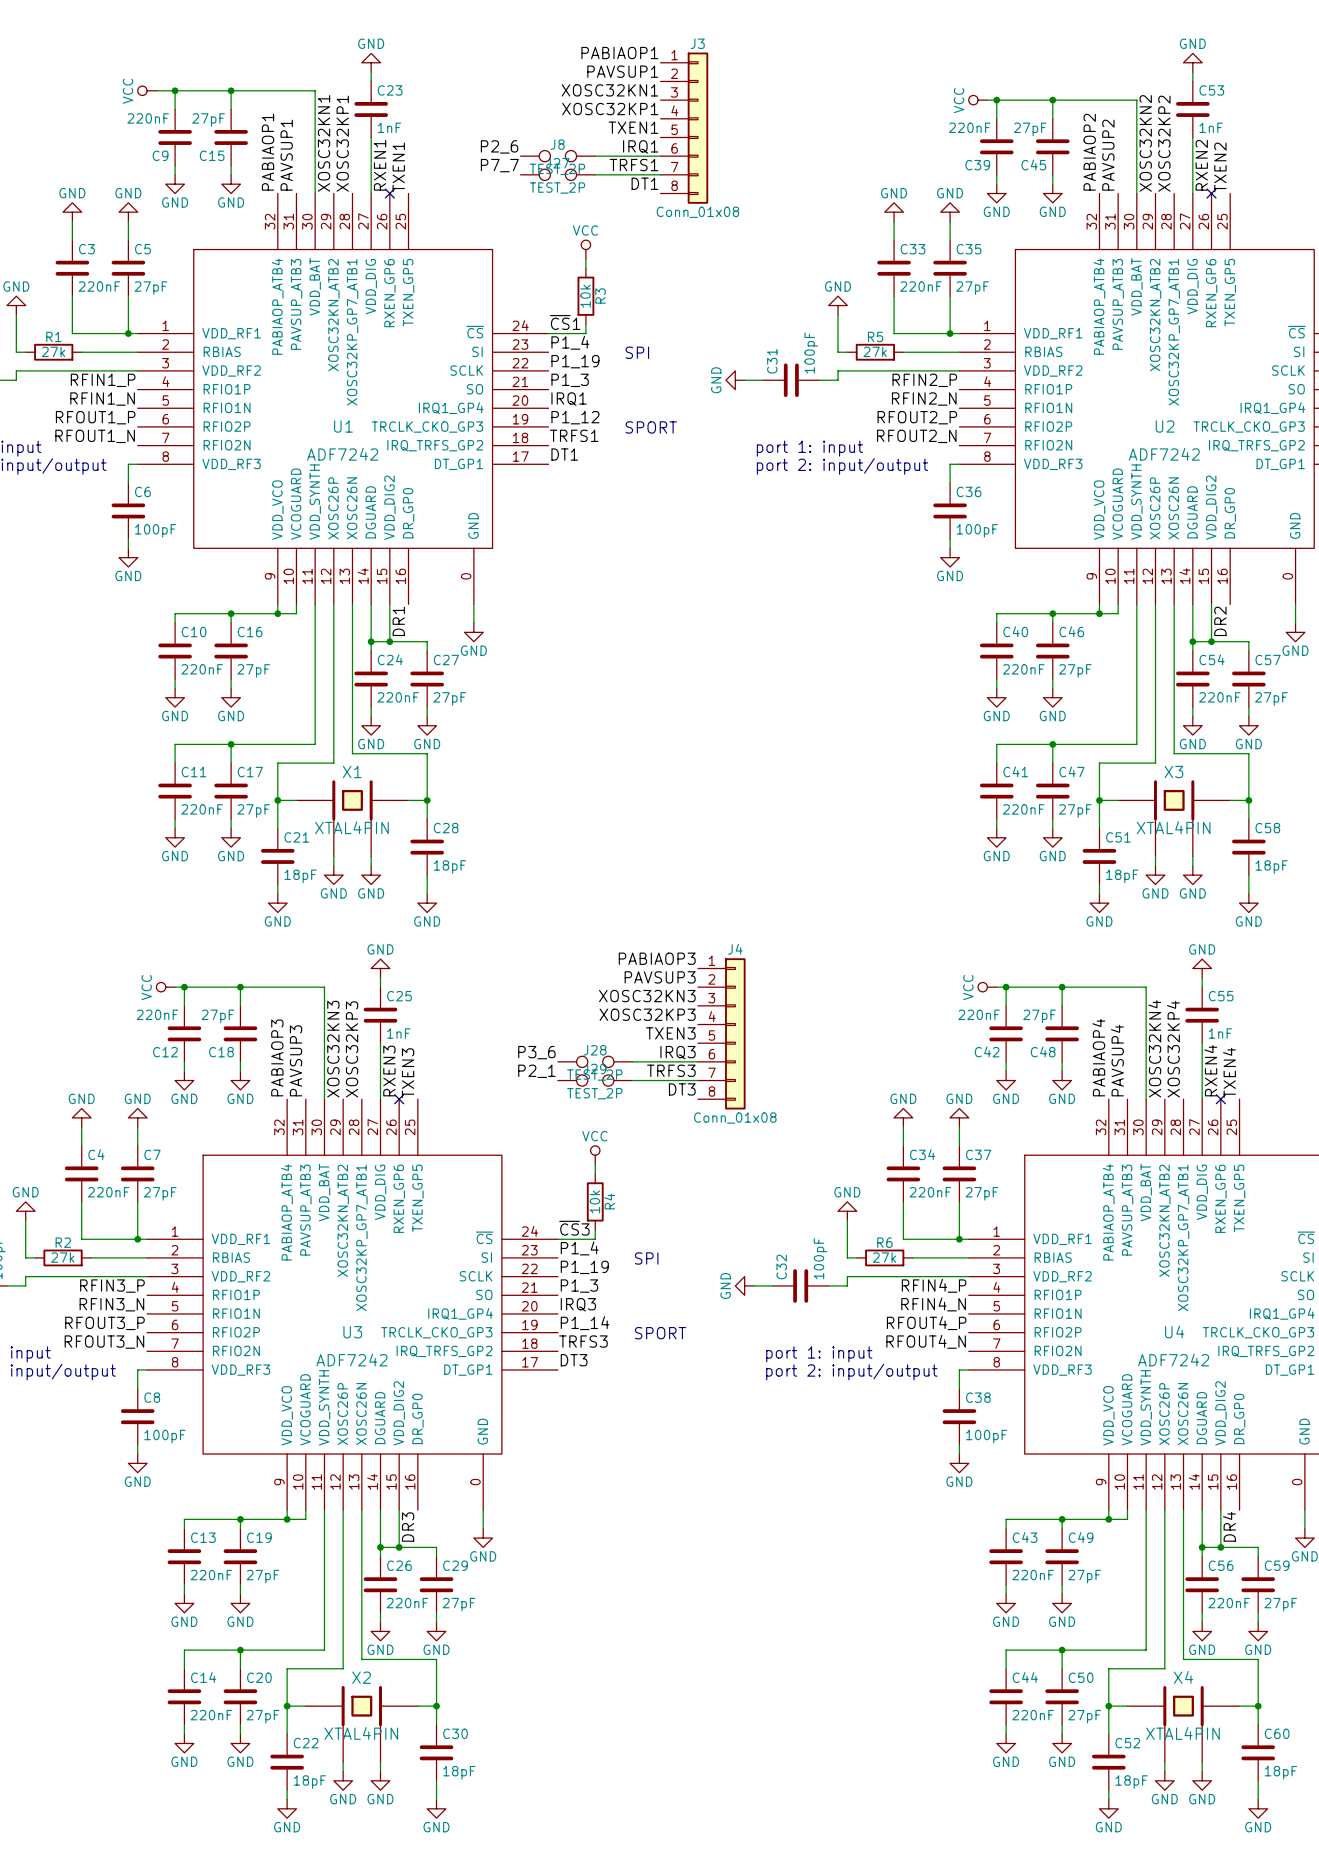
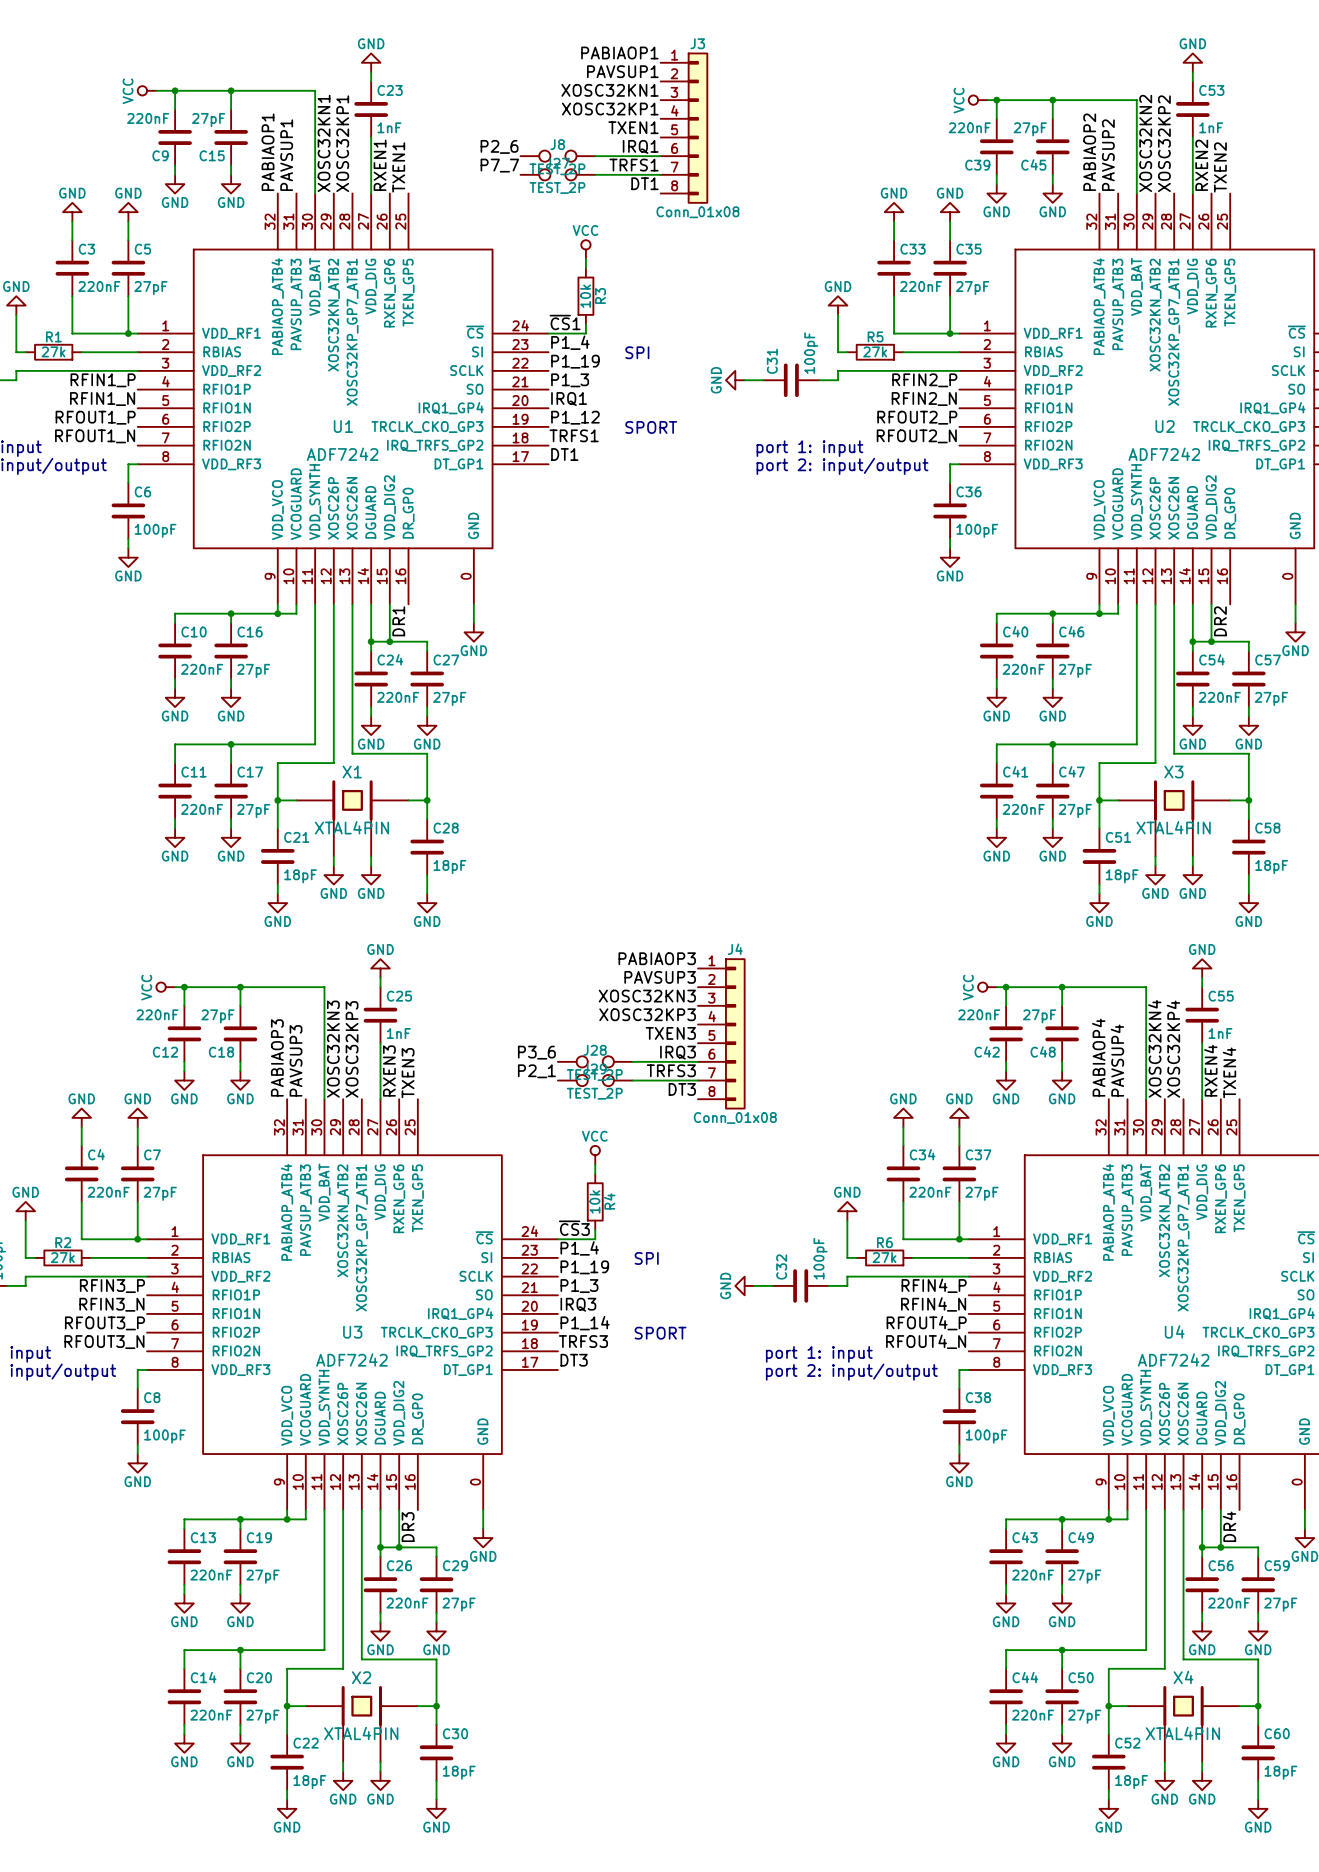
no-connect mark: (389, 193) -> none
no-connect mark: (1211, 193) -> none
no-connect mark: (399, 1099) -> none
no-connect mark: (1220, 1099) -> none

